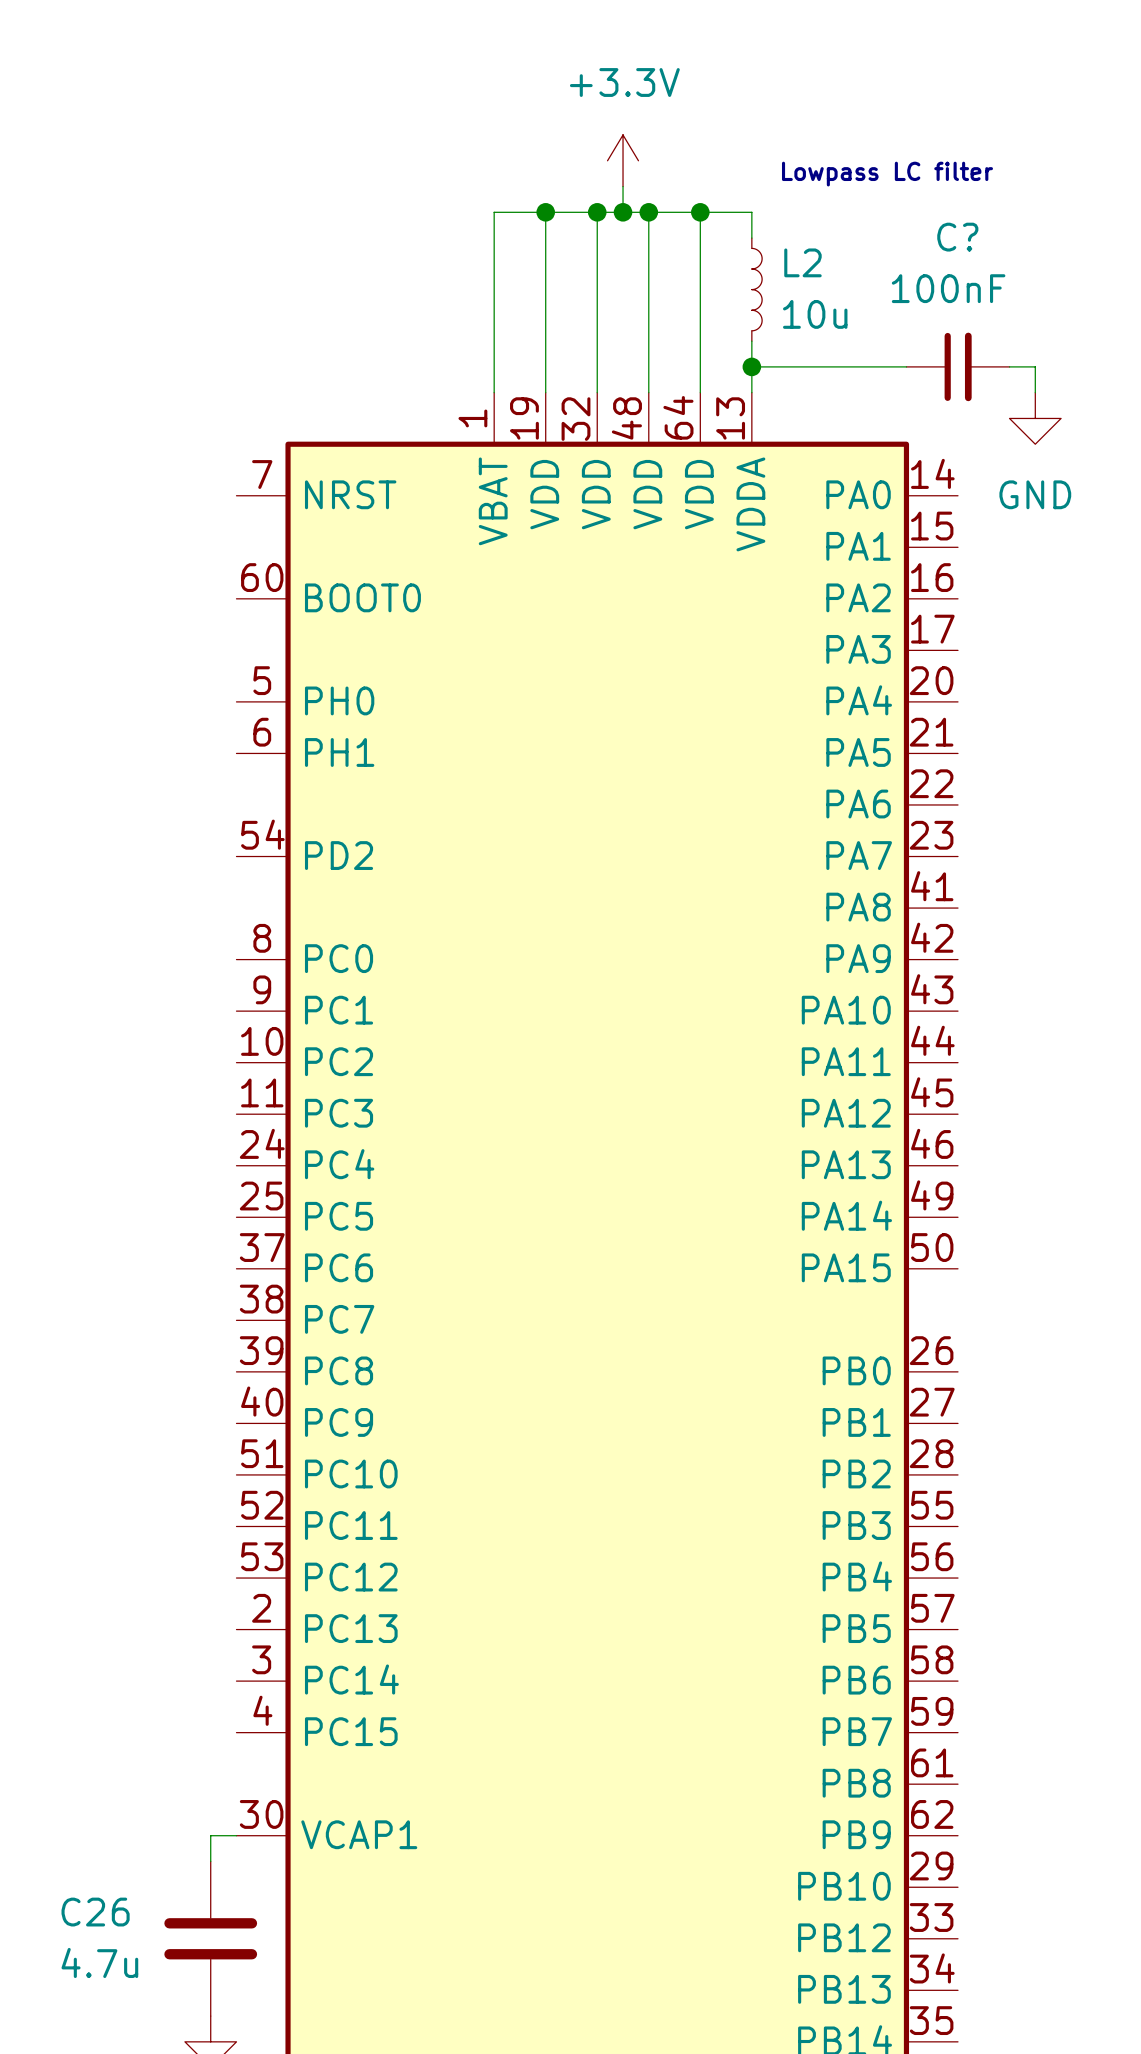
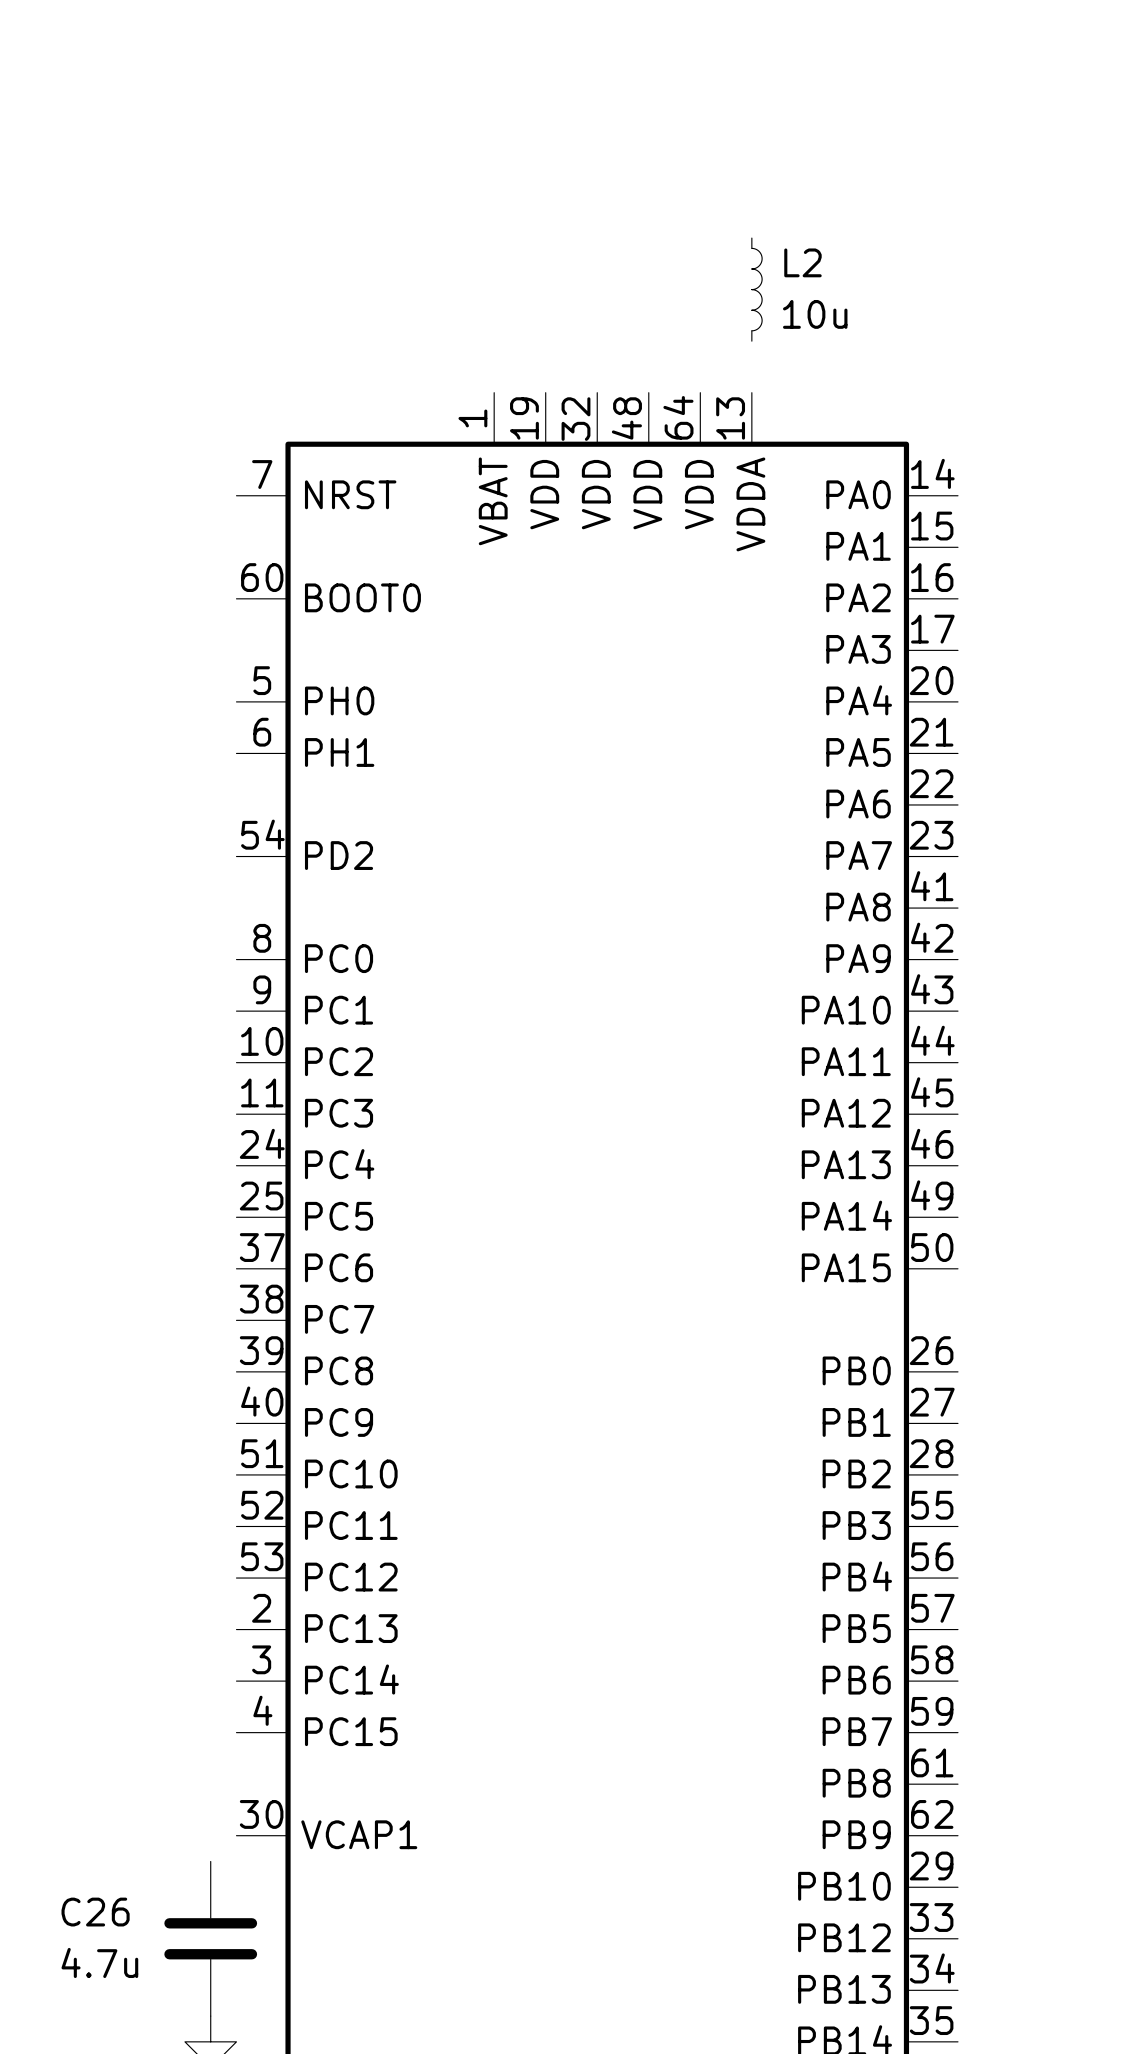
power symbol: +3.3V (623, 160) -> none
text: Lowpass LC filter (887, 174) -> none
wire: (623, 186) (623, 212) -> none
wire: (545, 212) (545, 392) -> none
junction: (545, 212) -> none
wire: (597, 212) (597, 392) -> none
junction: (597, 212) -> none
junction: (623, 212) -> none
wire: (648, 212) (648, 392) -> none
junction: (648, 212) -> none
wire: (700, 212) (700, 392) -> none
junction: (700, 212) -> none
wire: (751, 238) (751, 212) (494, 212) (494, 392) -> none
wire: (751, 341) (751, 392) -> none
wire: (751, 366) (906, 366) -> none
junction: (751, 366) -> none
C?: 100nF (958, 366) -> none
wire: (1009, 366) (1035, 366) (1035, 392) -> none
power symbol: GND (1035, 418) -> none
wire: (236, 1835) (210, 1835) (210, 1861) -> none

